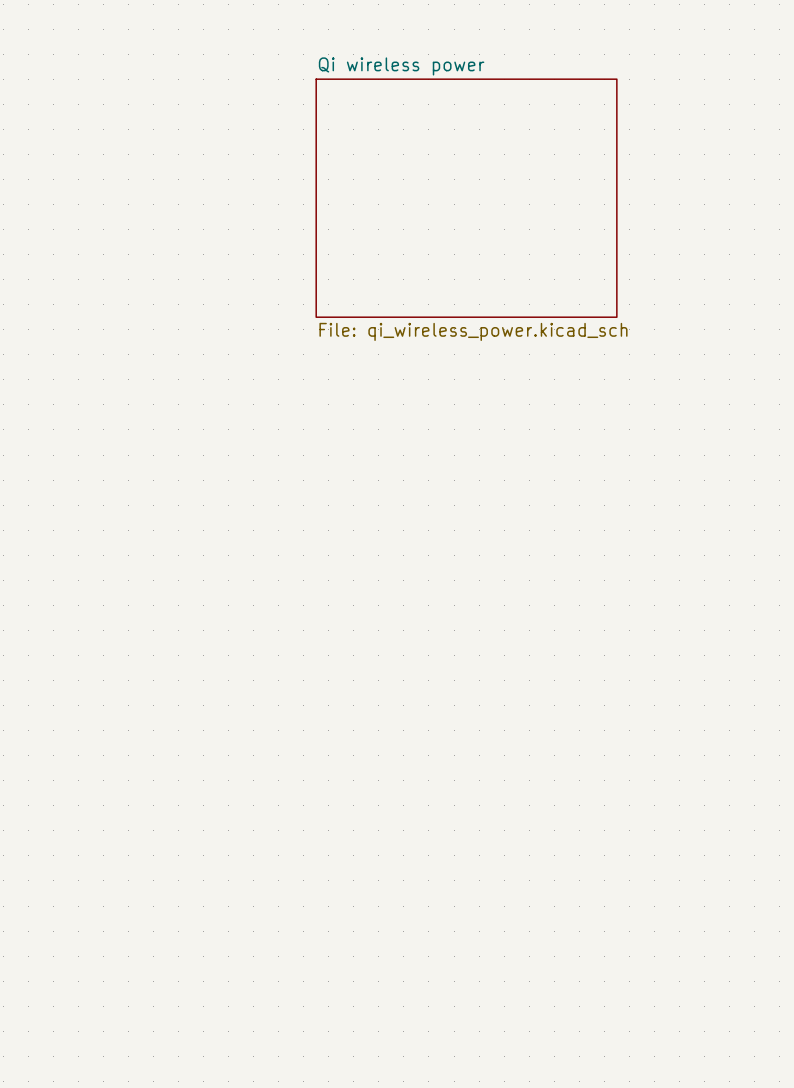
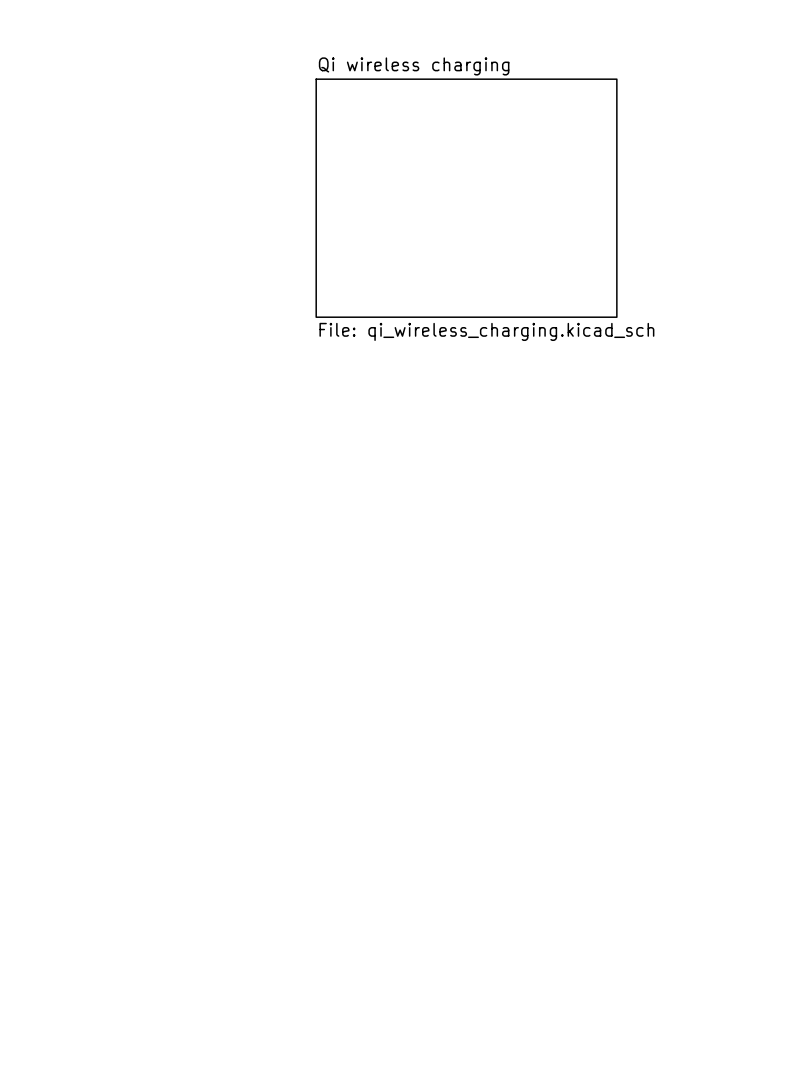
sheet Qi wireless power name: Qi wireless power (401, 66) -> Qi wireless charging (414, 66)
sheet Qi wireless power value: File: qi_wireless_power.kicad_sch (473, 331) -> File: qi_wireless_charging.kicad_sch (486, 331)

